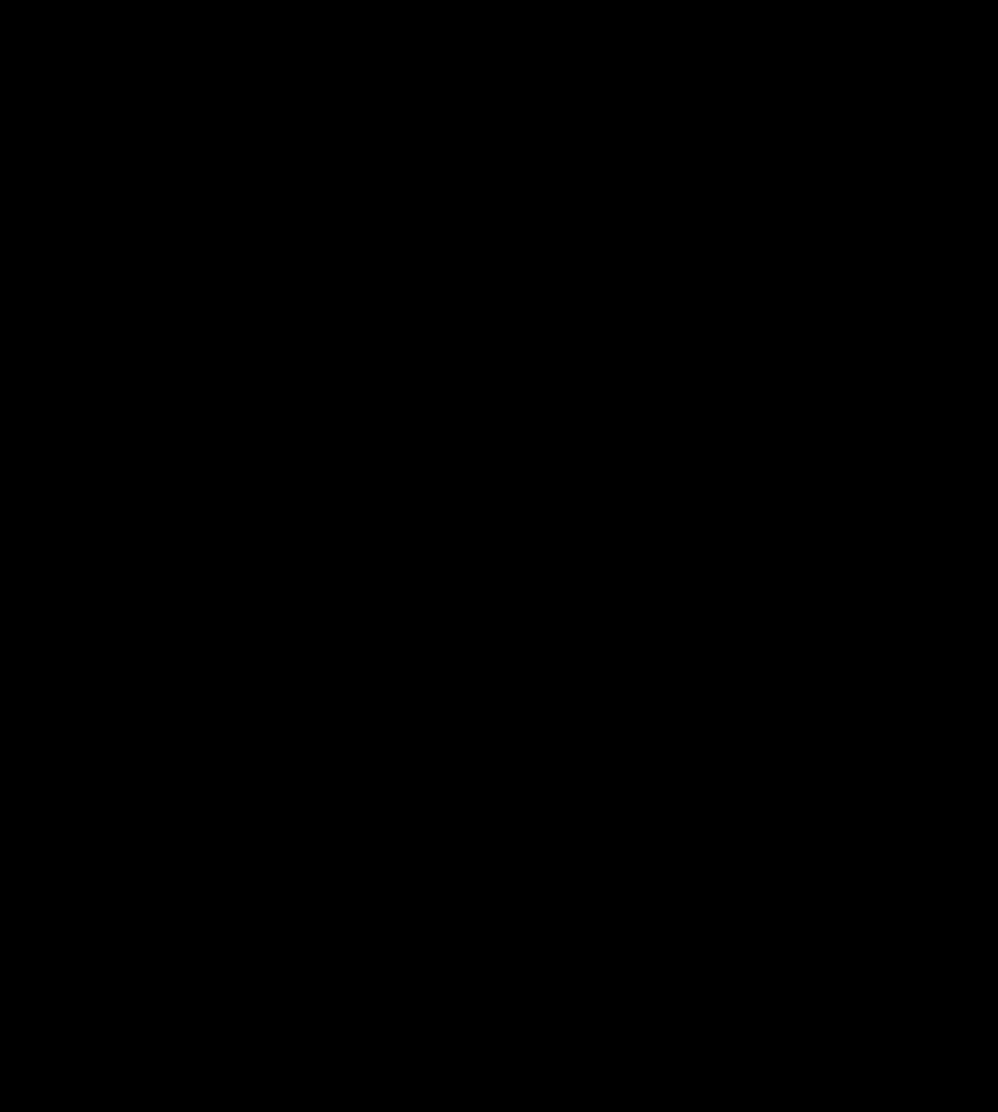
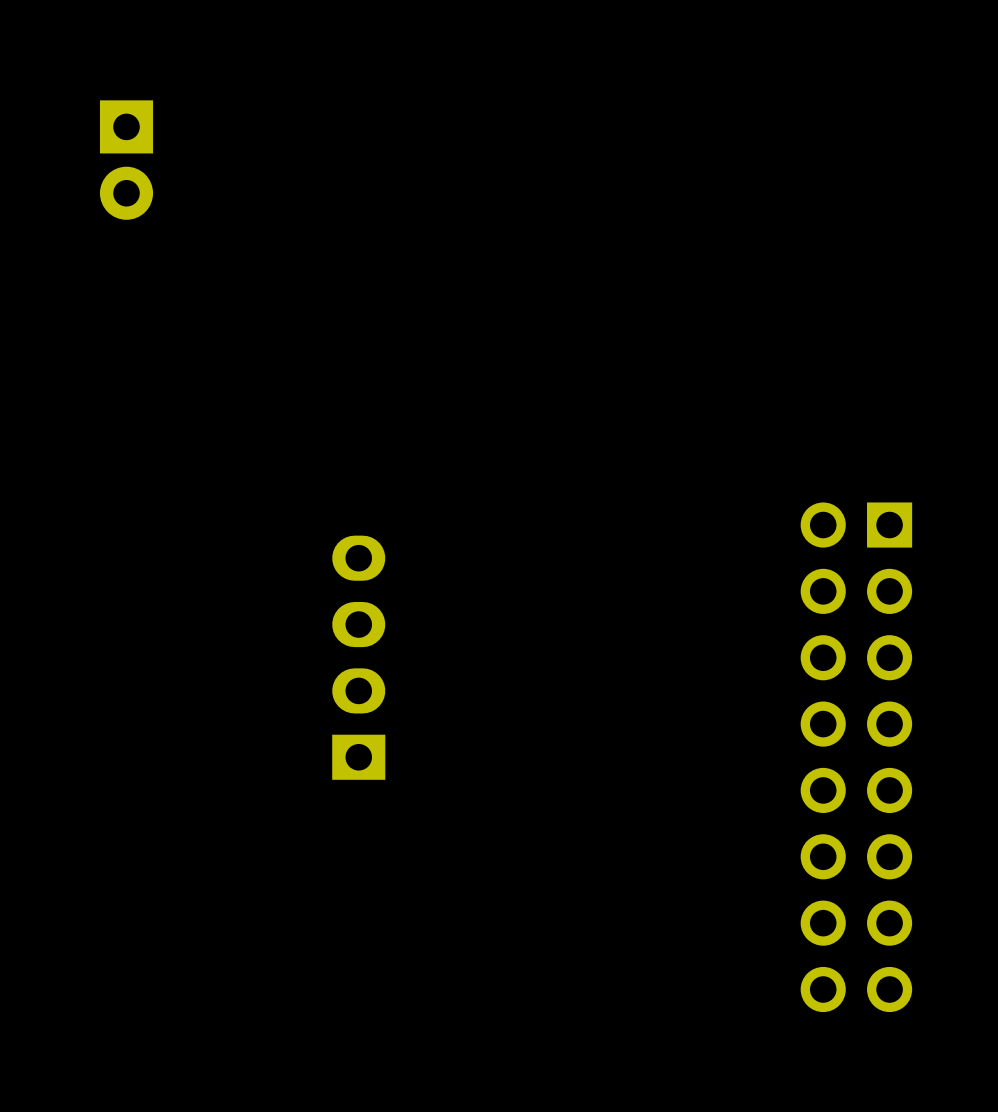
part: none -> (126, 160)
part: none -> (358, 657)
part: none -> (856, 757)

